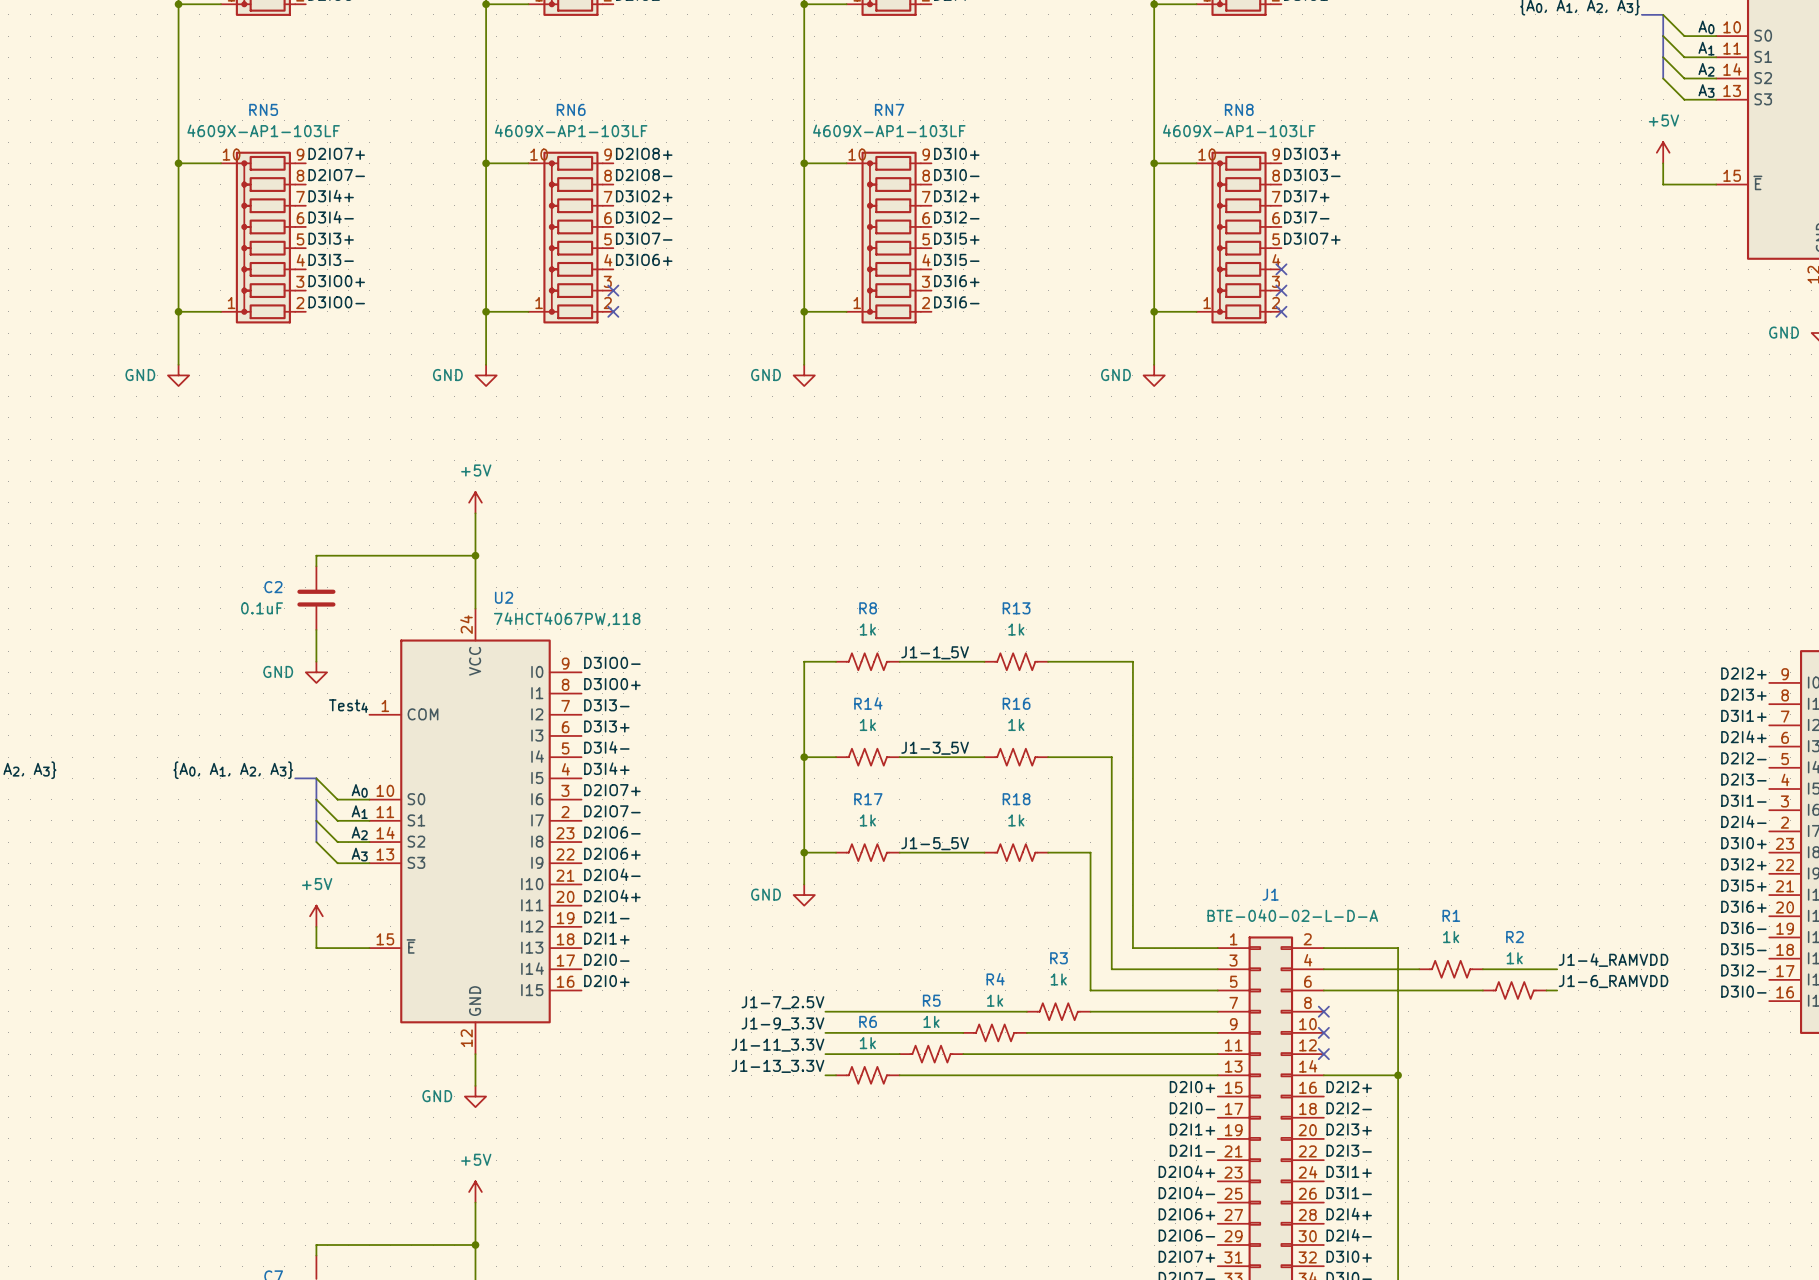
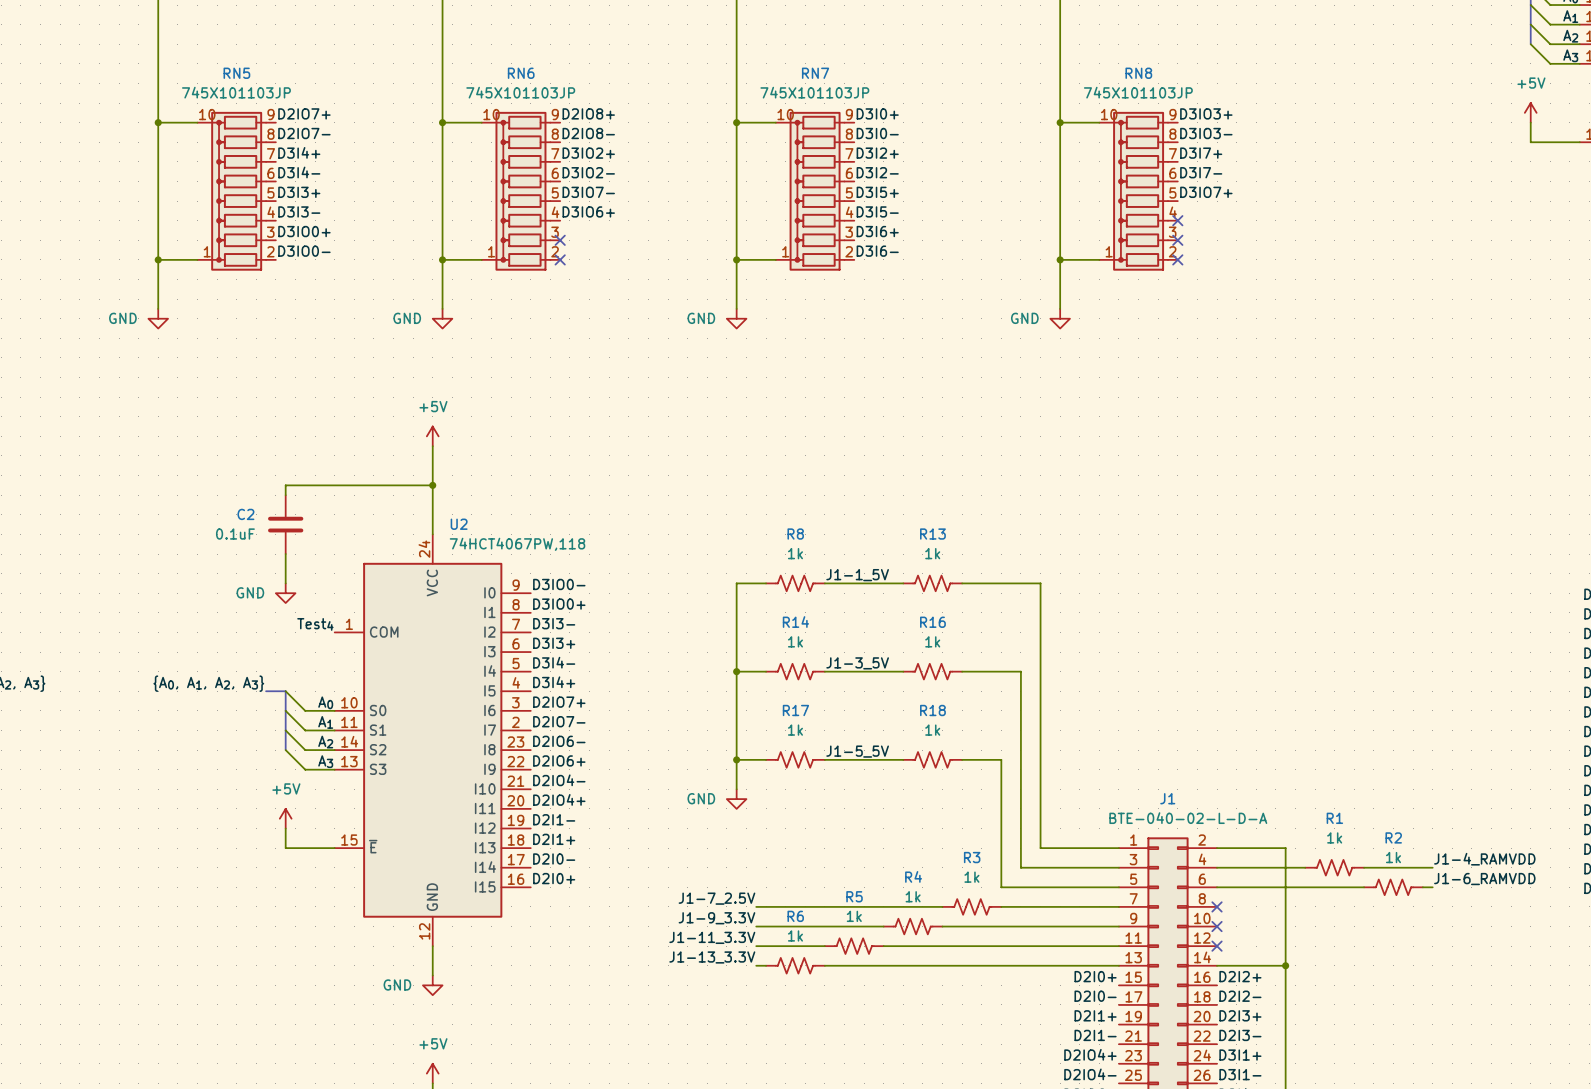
RN5 value: 4609X-AP1-103LF (263, 130) -> 745X101103JP (236, 92)
RN6 value: 4609X-AP1-103LF (571, 130) -> 745X101103JP (520, 92)
RN7 value: 4609X-AP1-103LF (889, 130) -> 745X101103JP (814, 92)
RN8 value: 4609X-AP1-103LF (1239, 130) -> 745X101103JP (1138, 92)

